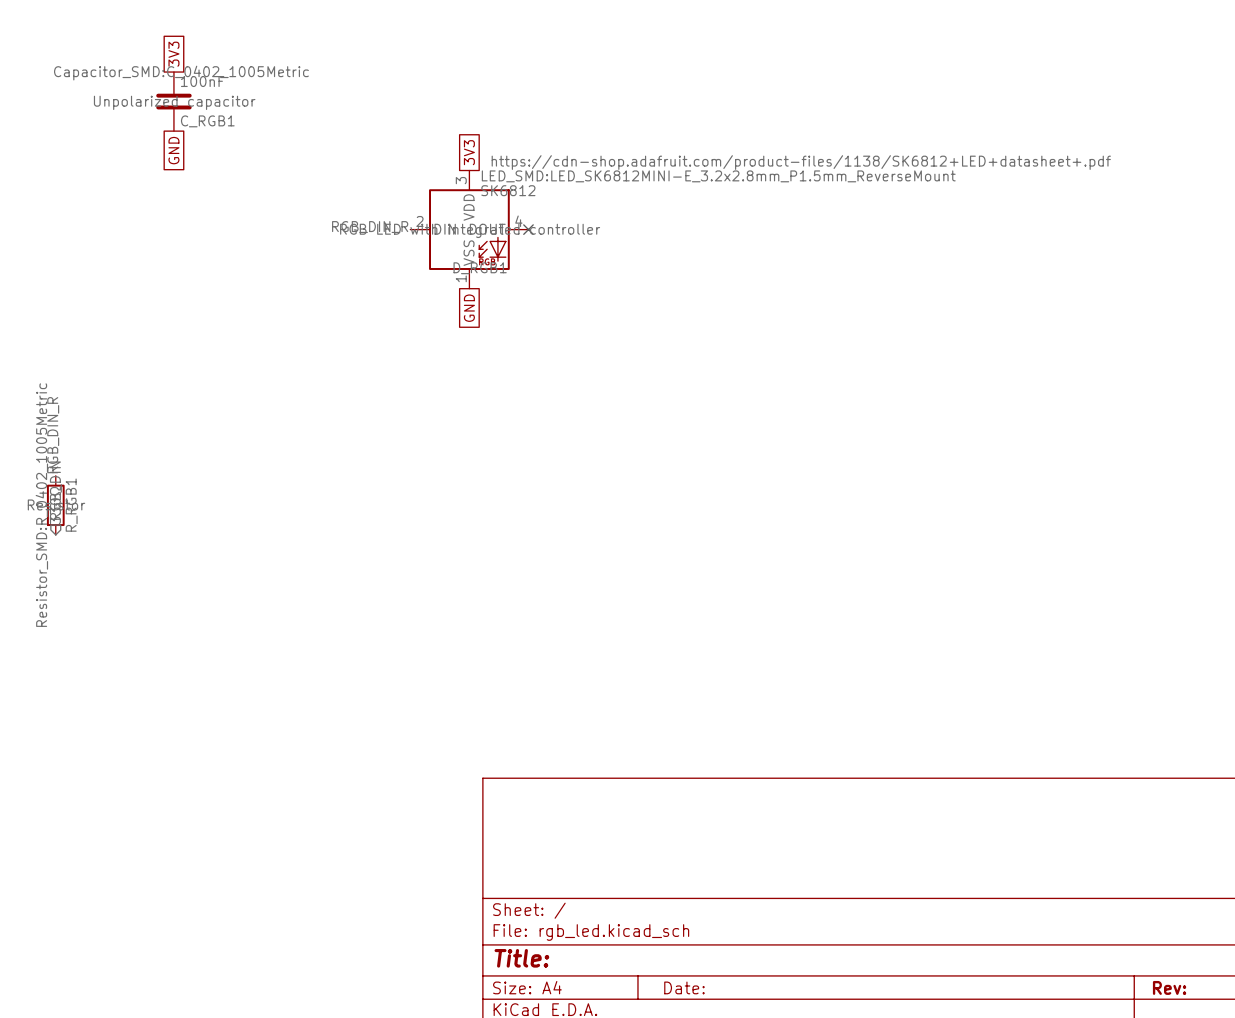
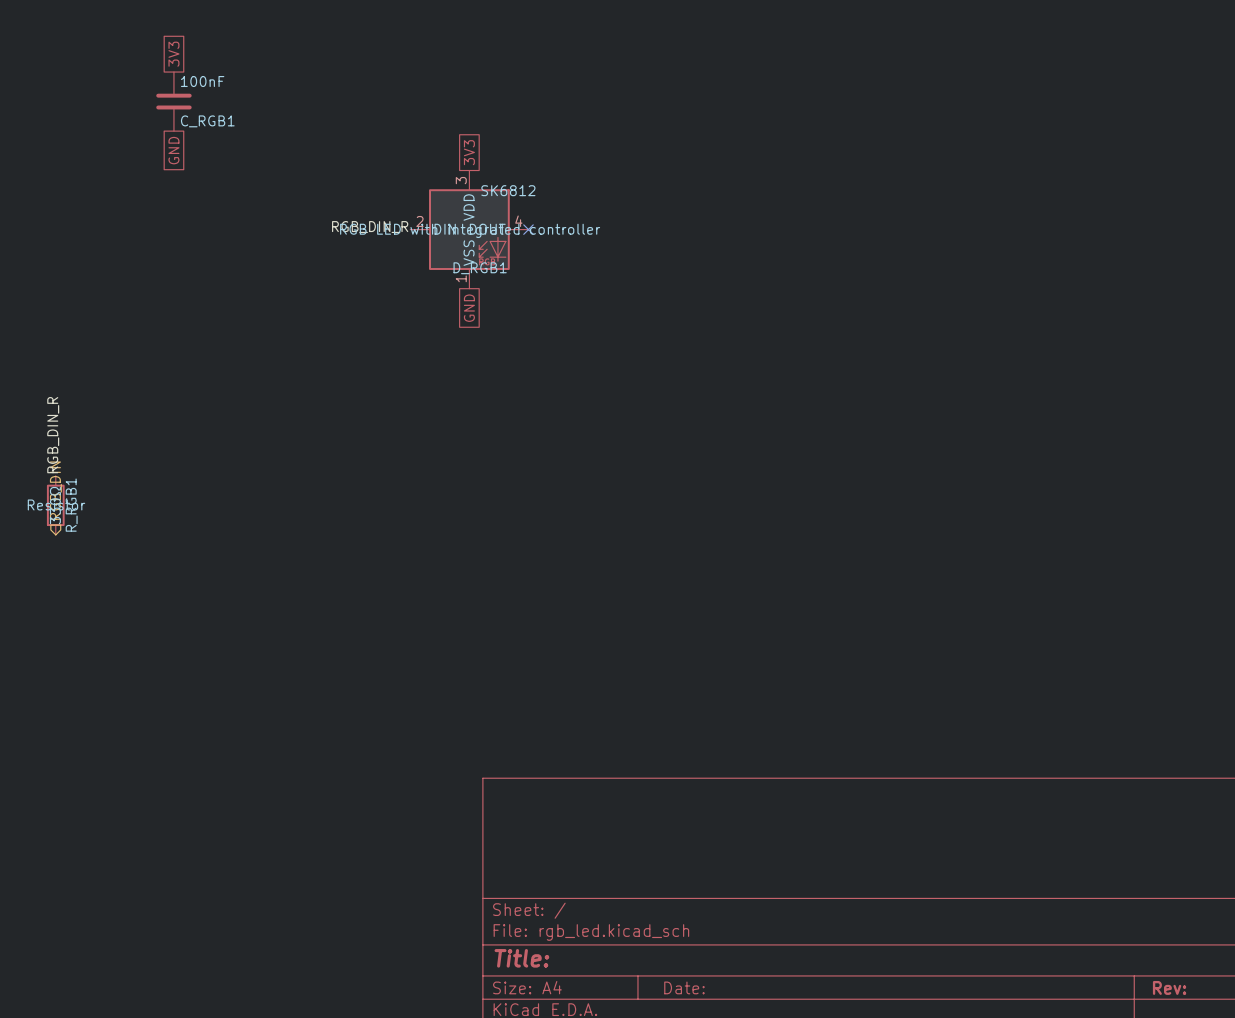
C_RGB1 text: Capacitor_SMD:C_0402_1005Metric (181, 73) -> none
C_RGB1 text: Unpolarized capacitor (174, 102) -> none
D_RGB1 text: https://cdn-shop.adafruit.com/product-files/1138/SK6812+LED+datasheet+.pdf (801, 162) -> none
D_RGB1 text: LED_SMD:LED_SK6812MINI-E_3.2x2.8mm_P1.5mm_ReverseMount (718, 176) -> none
R_RGB1 text: Resistor_SMD:R_0402_1005Metric (41, 505) -> none

